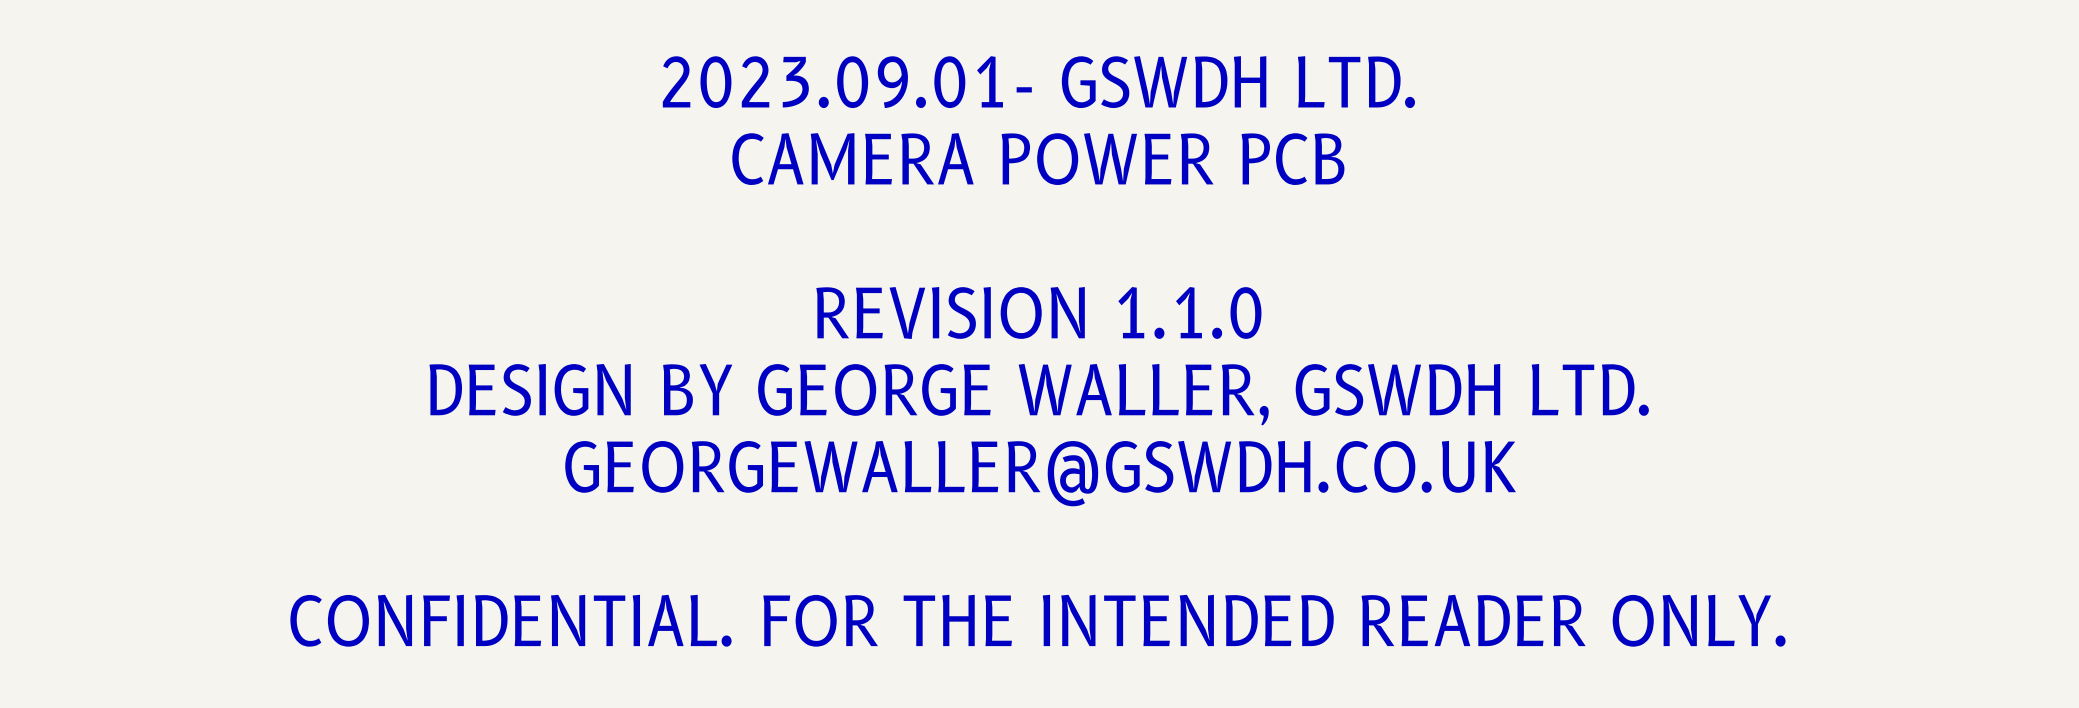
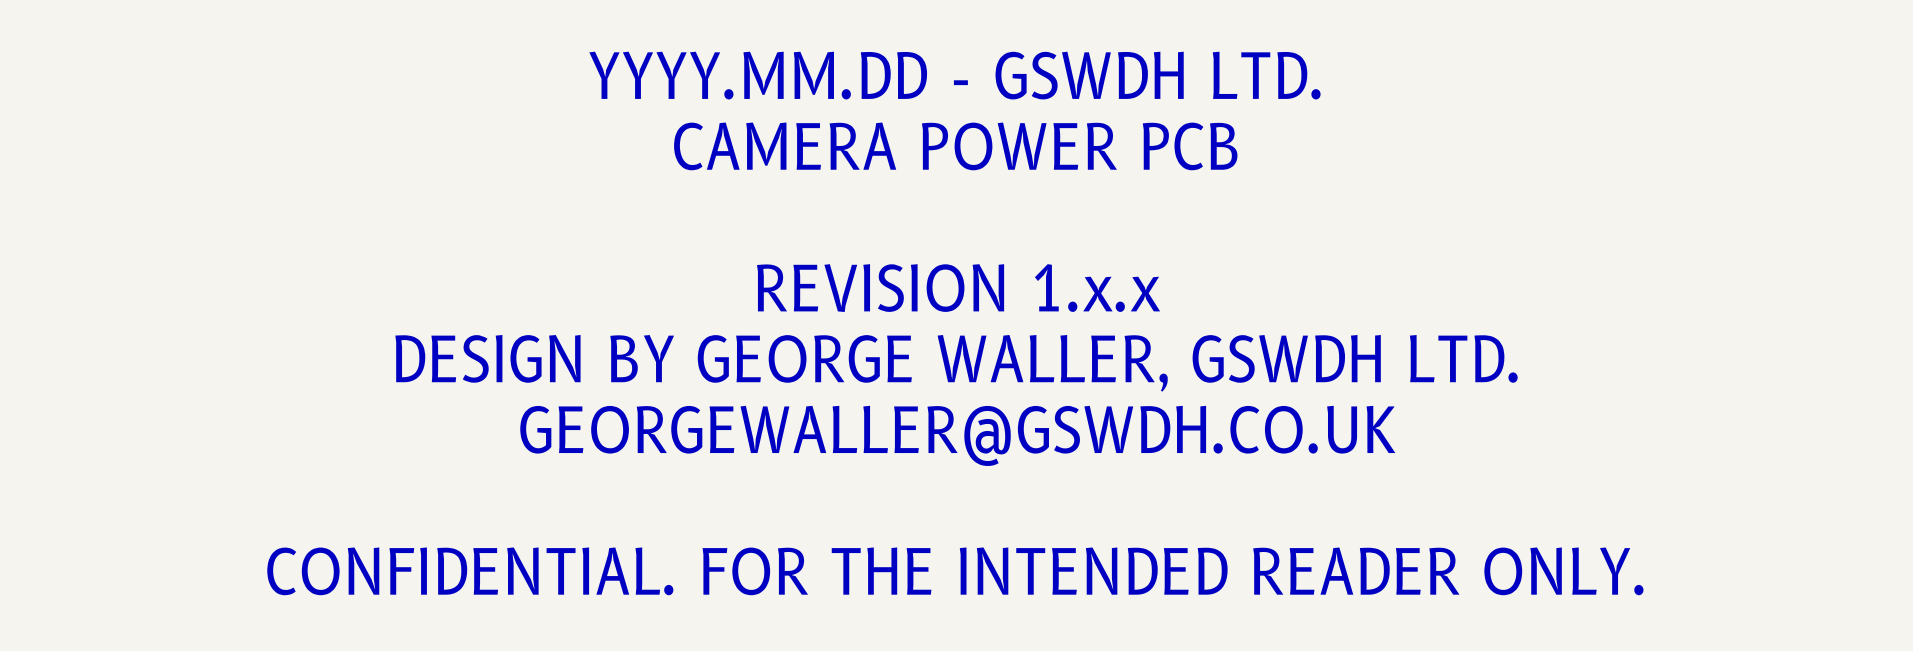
text: 2023.09.01- GSWDH LTD. (1038, 82) -> YYYY.MM.DD - GSWDH LTD. (954, 75)
text: REVISION 1.1.0 (1038, 313) -> REVISION 1.x.x (958, 288)

